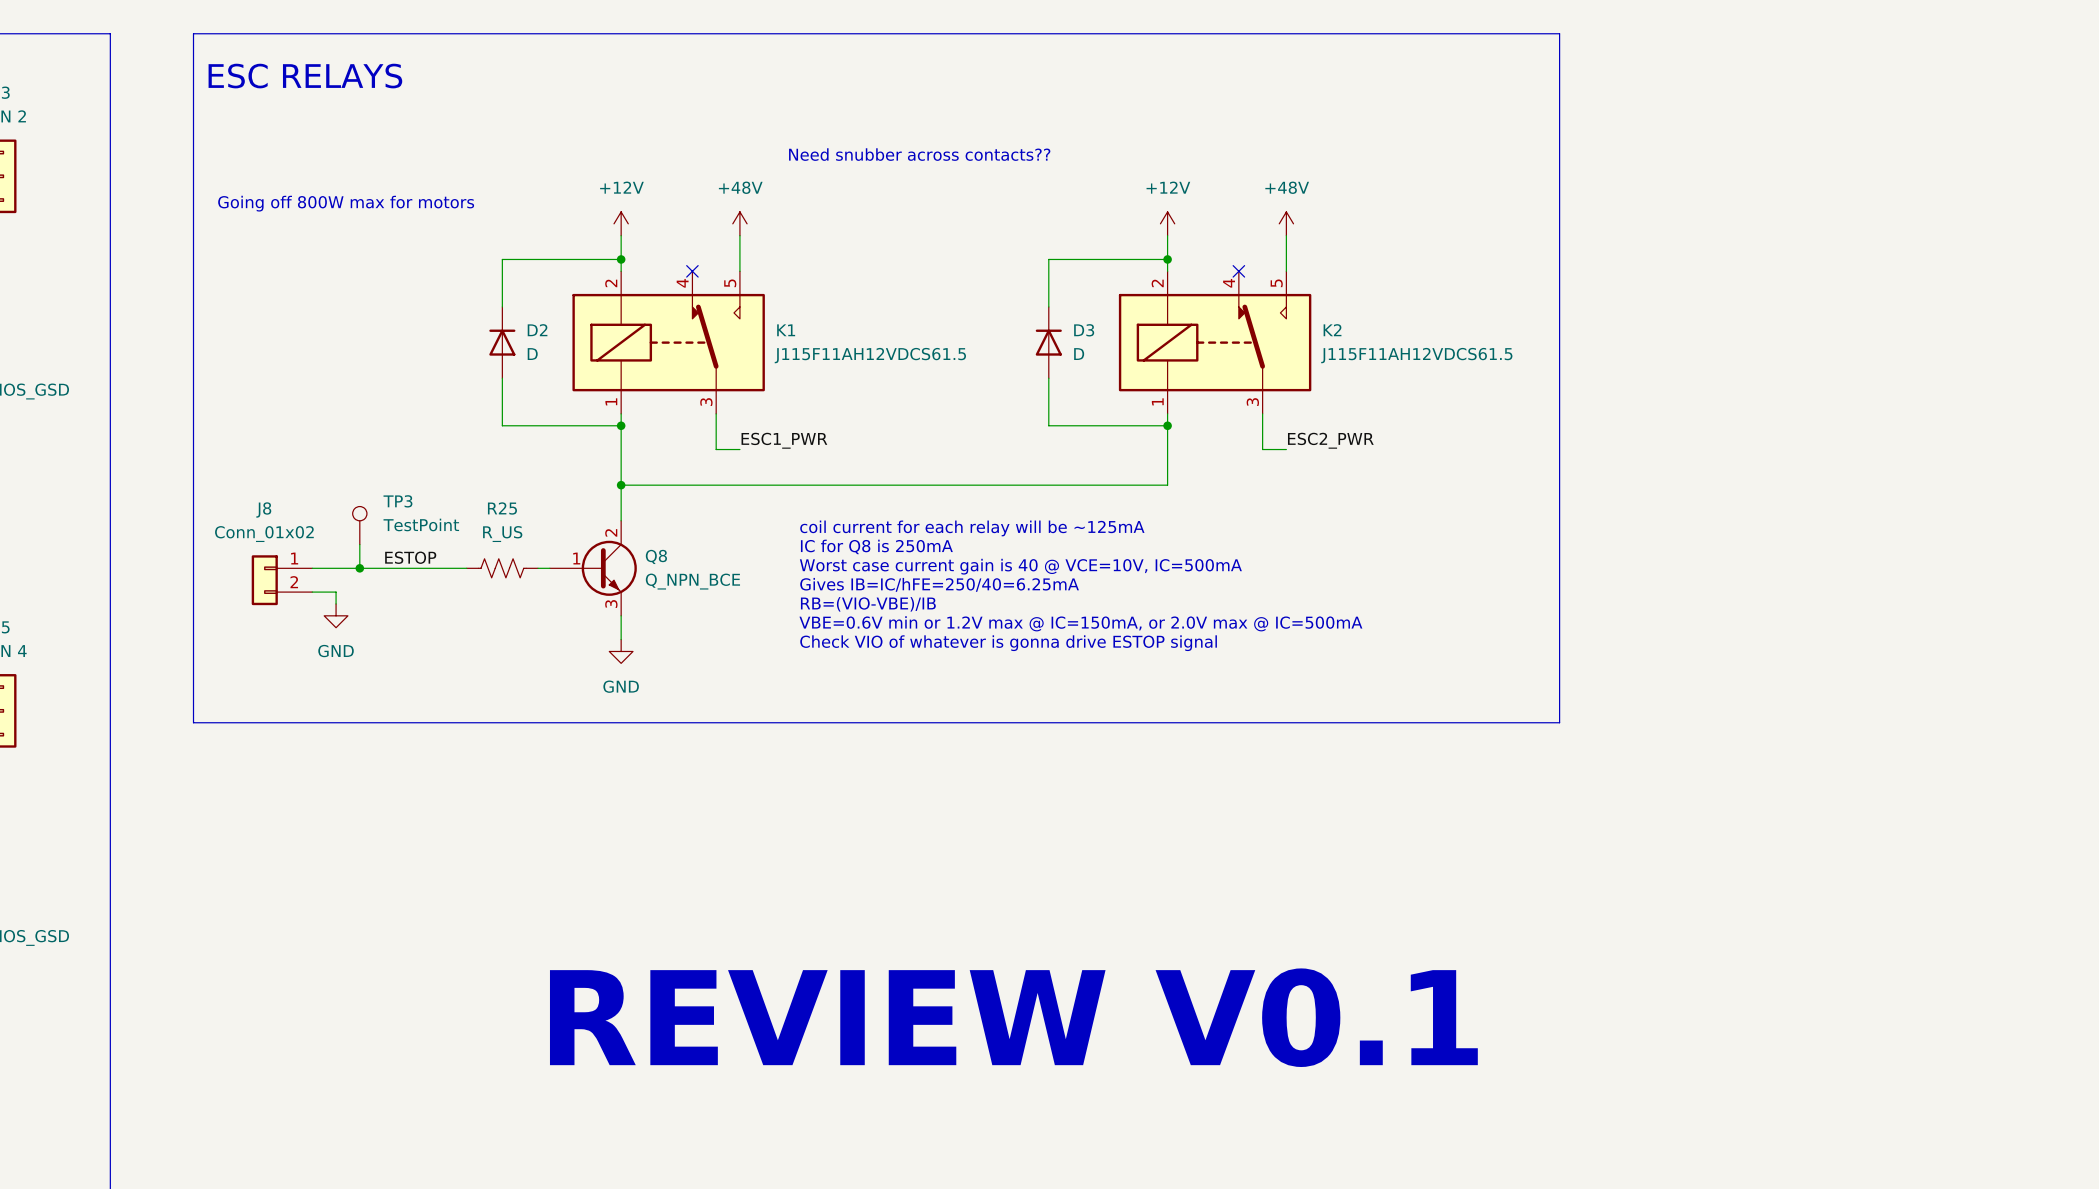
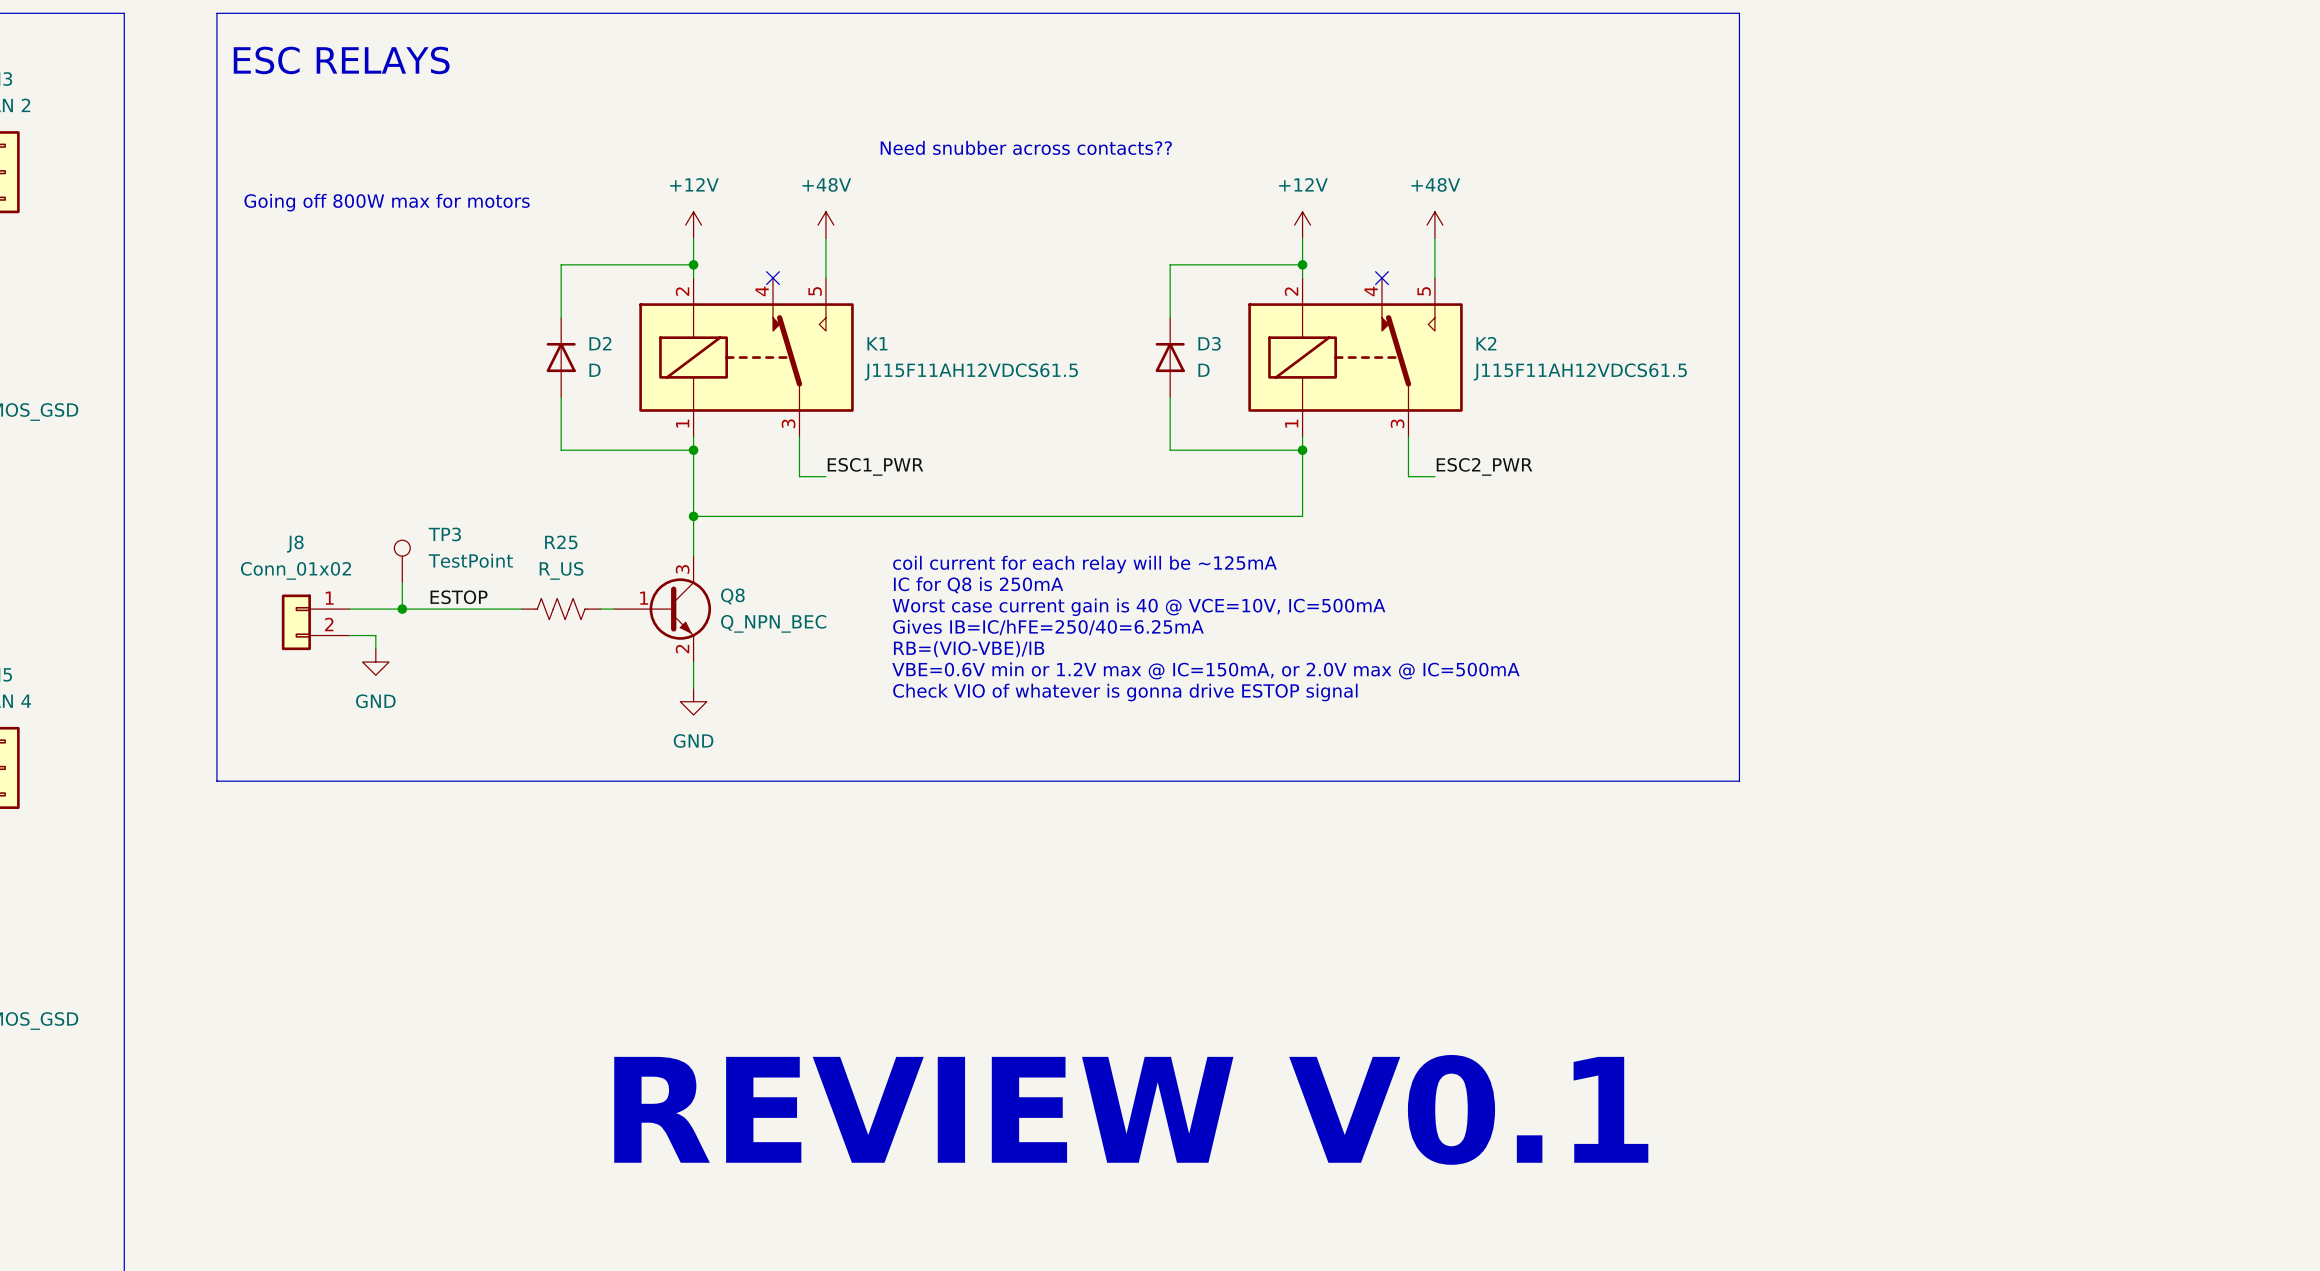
Q8 pin number: 2 (611, 532) -> 3 (682, 569)
Q8 value: Q_NPN_BCE (692, 581) -> Q_NPN_BEC (773, 623)
Q8 pin number: 3 (611, 603) -> 2 (682, 649)

